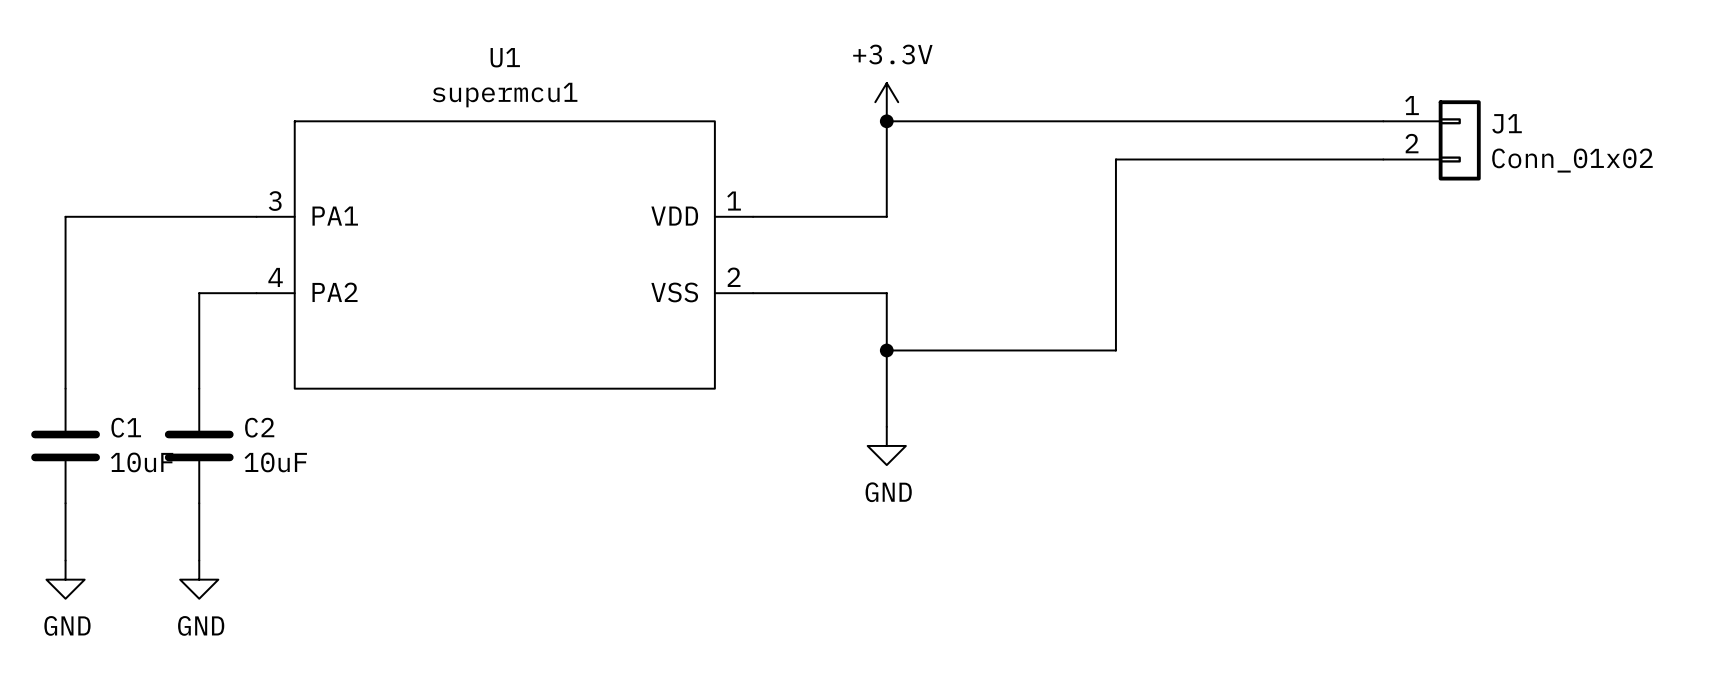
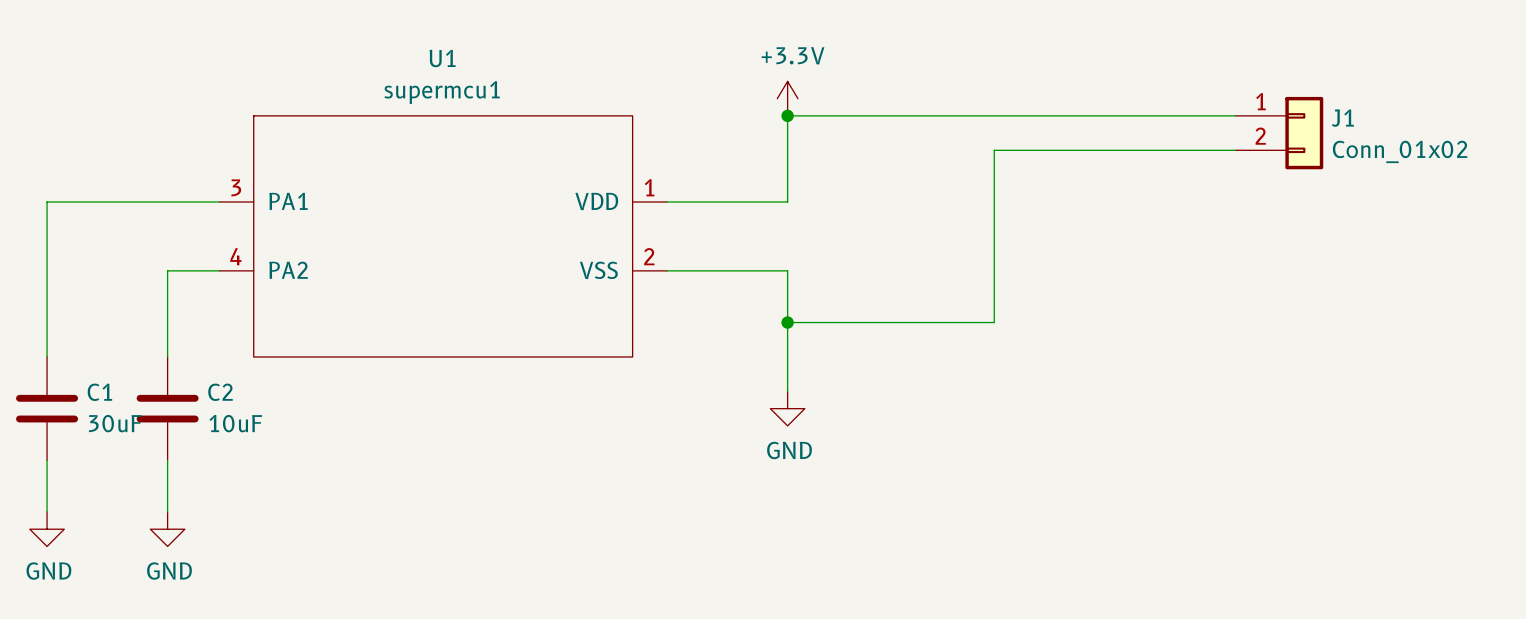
C1 value: 10uF (142, 462) -> 30uF (115, 423)

